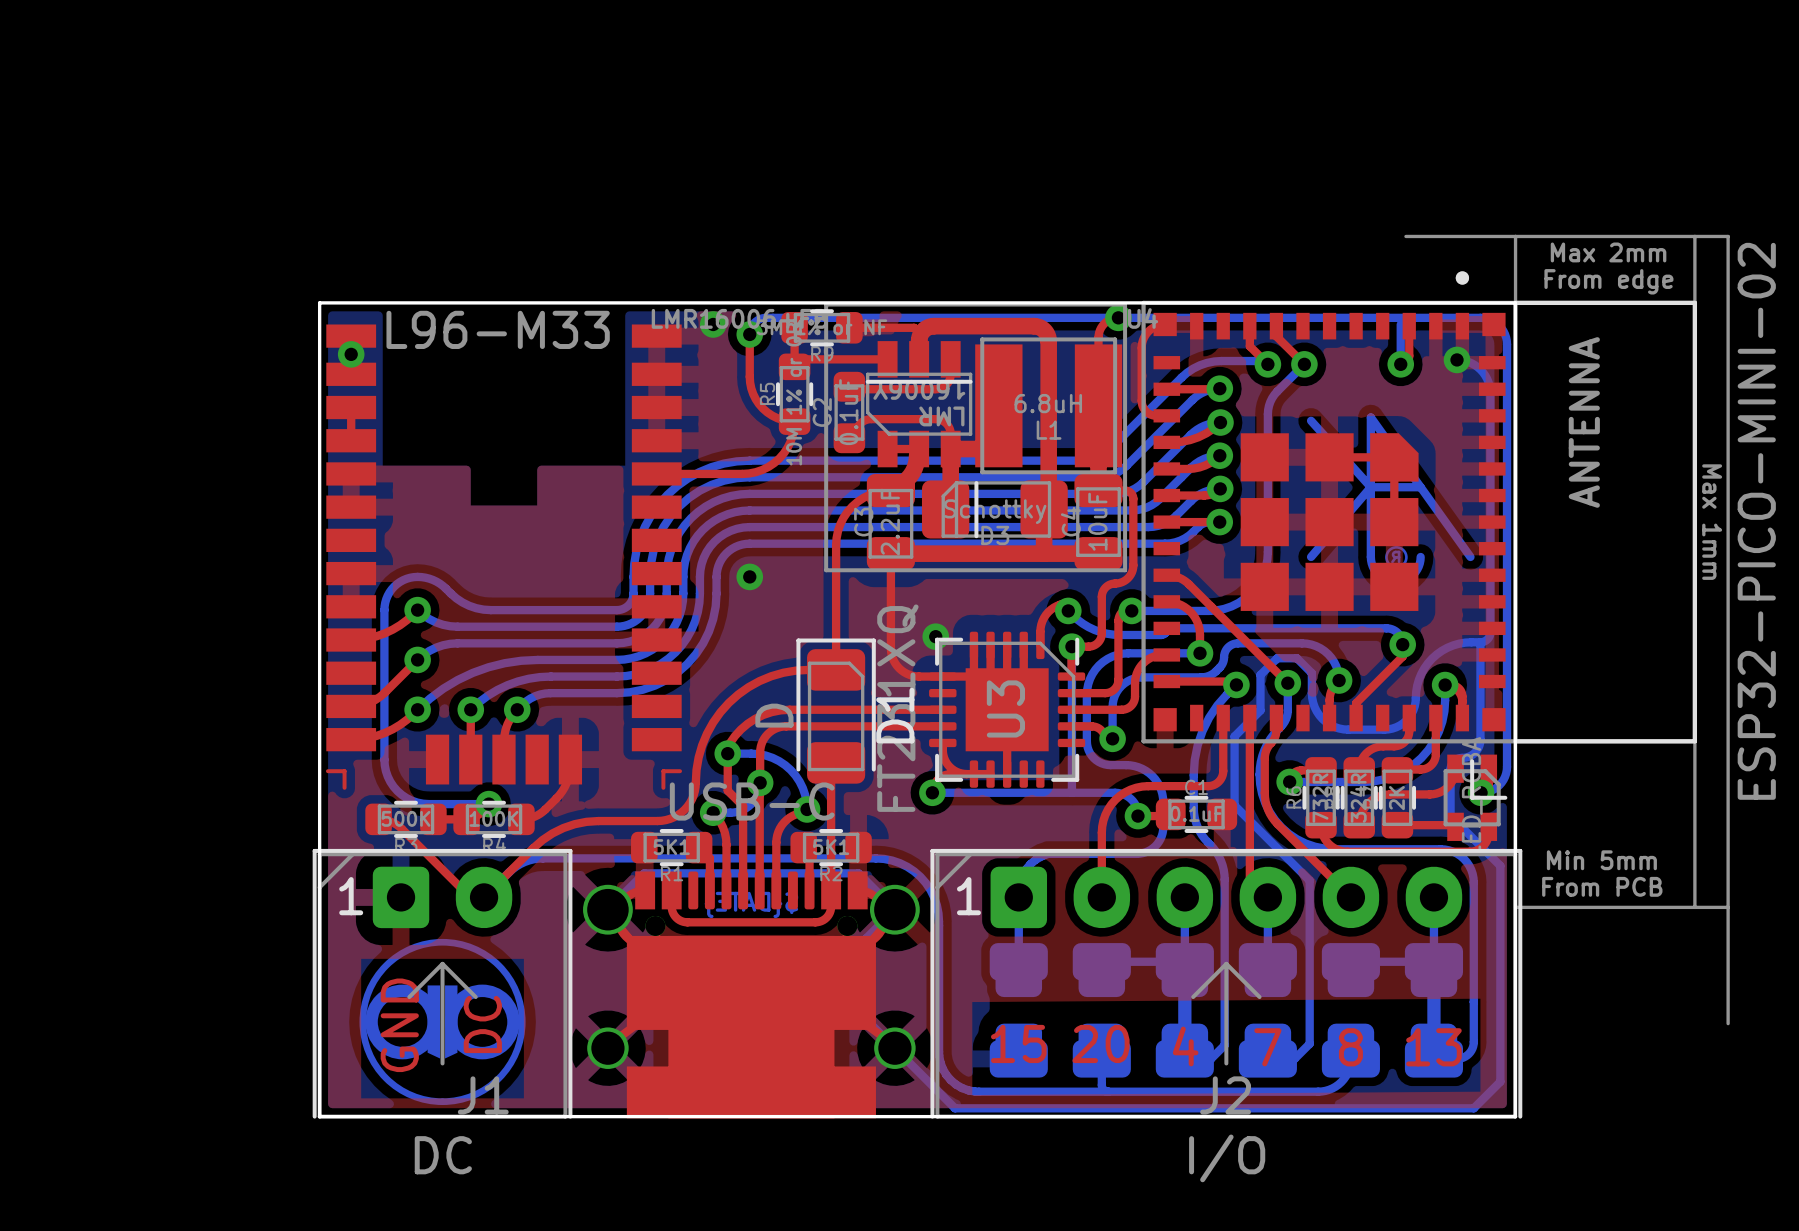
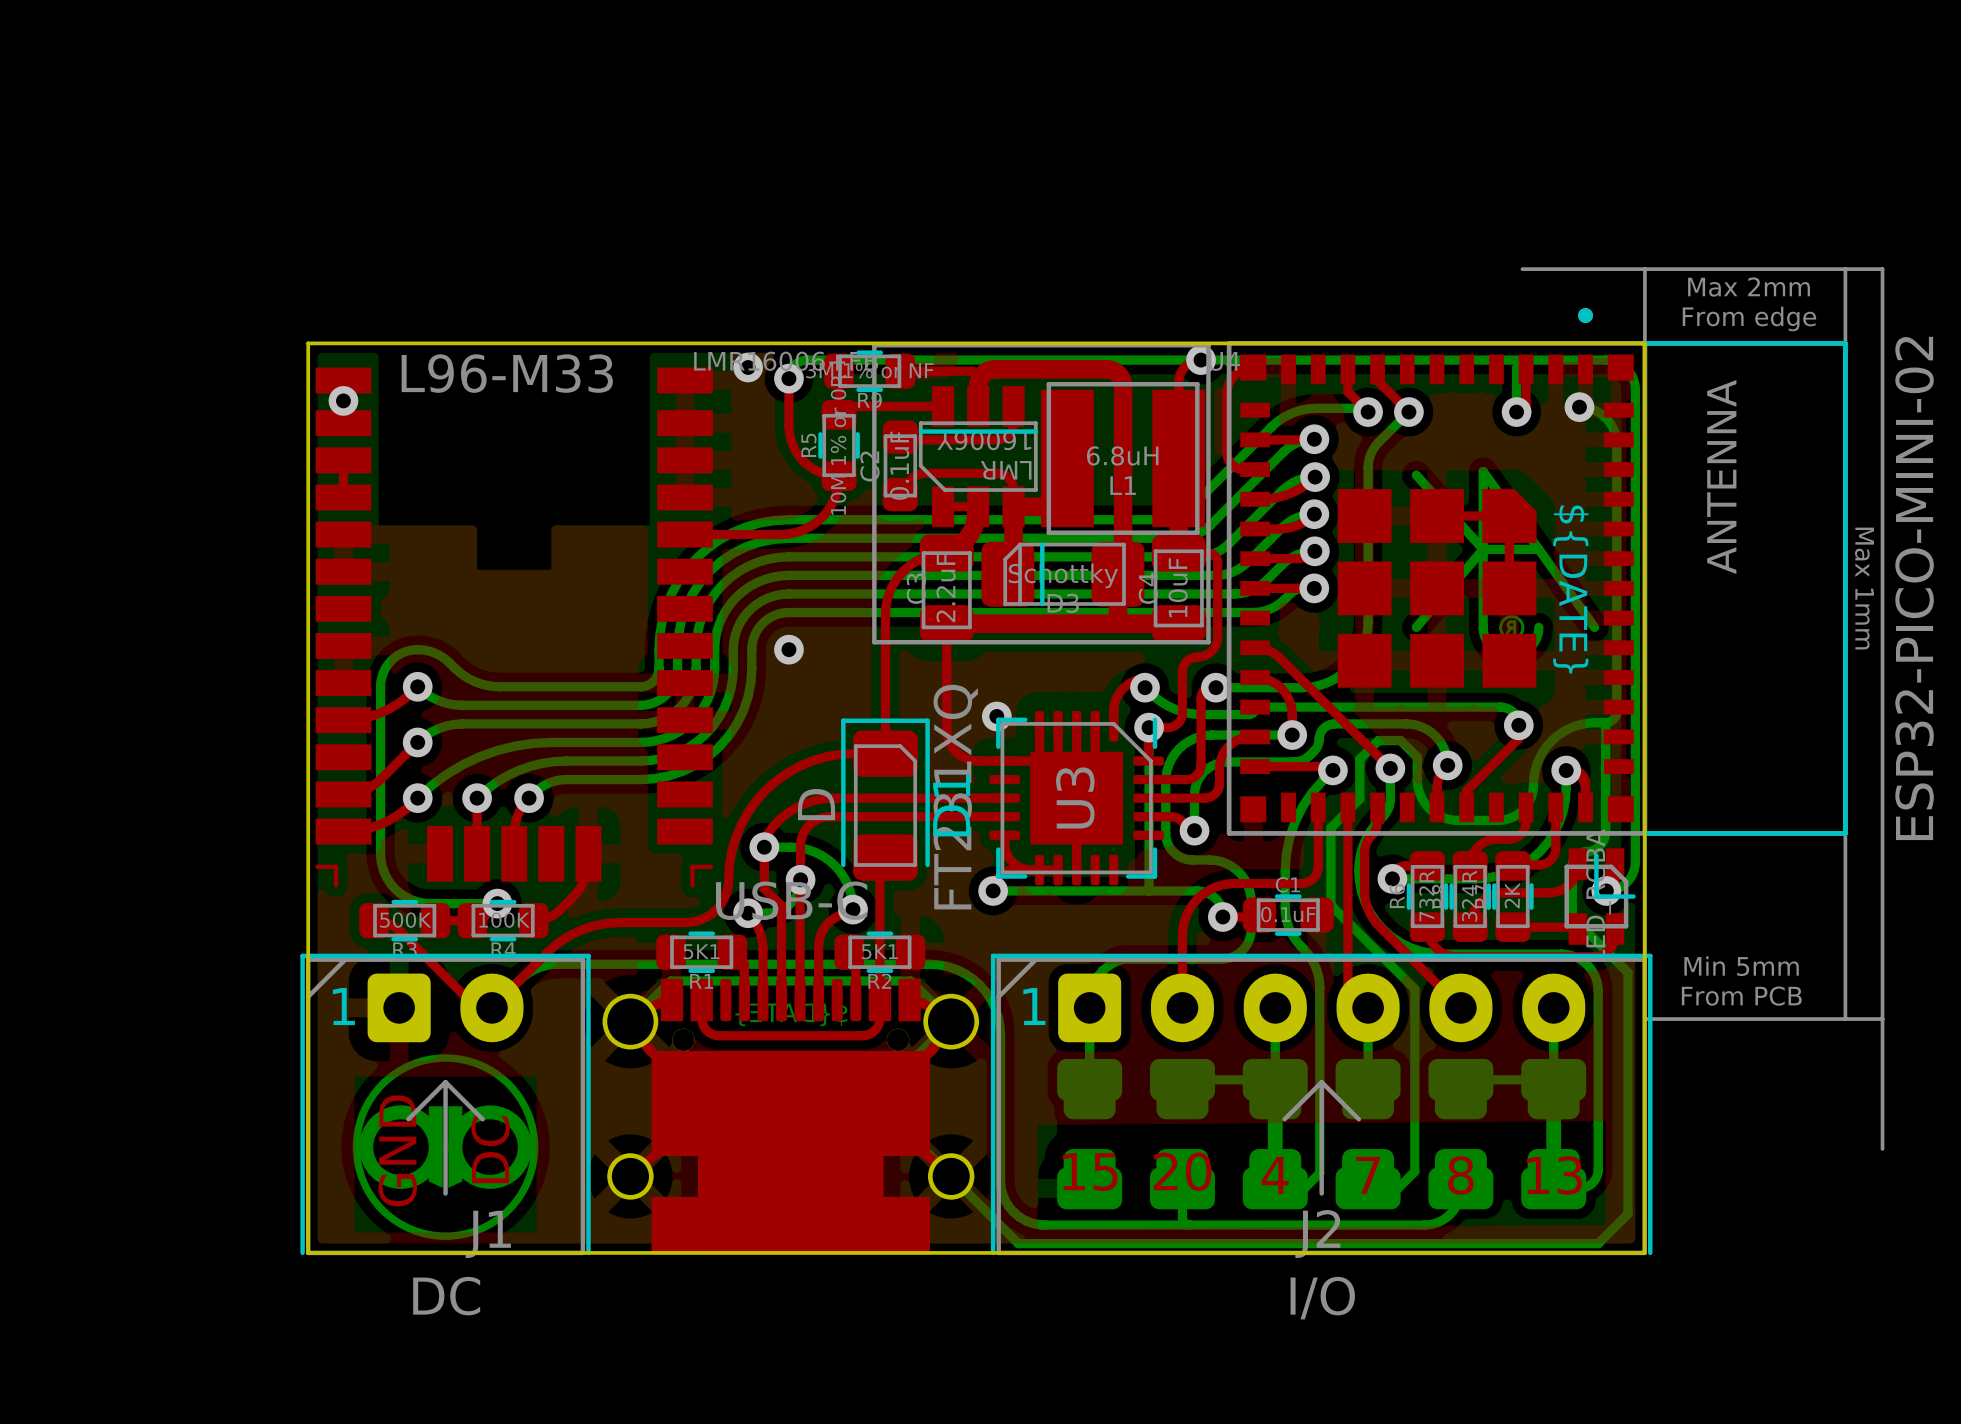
text: none -> ${DATE} (1570, 589)

